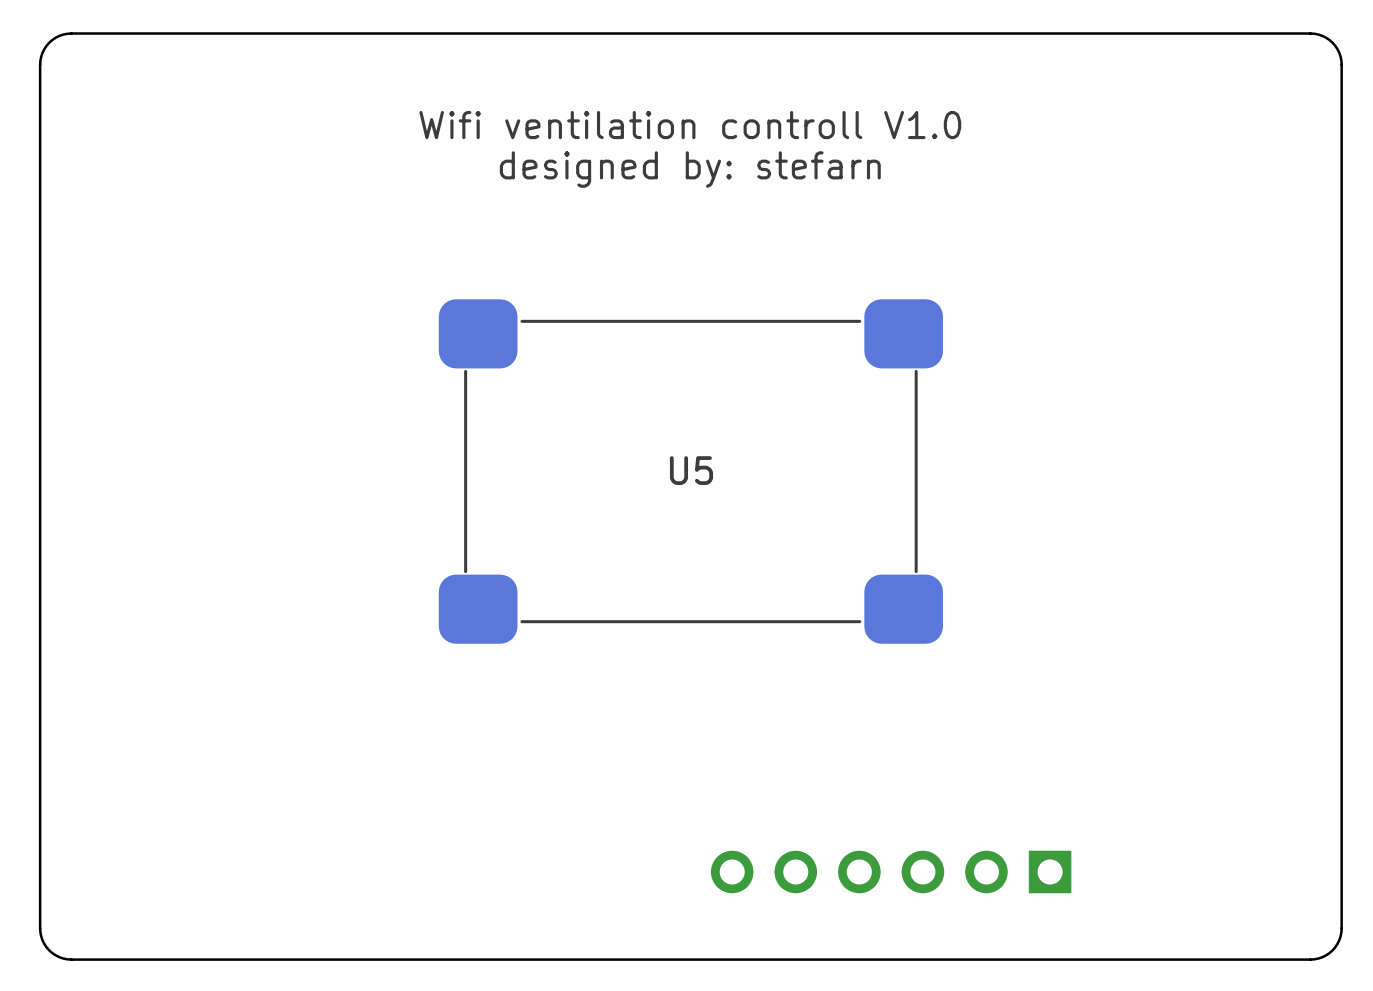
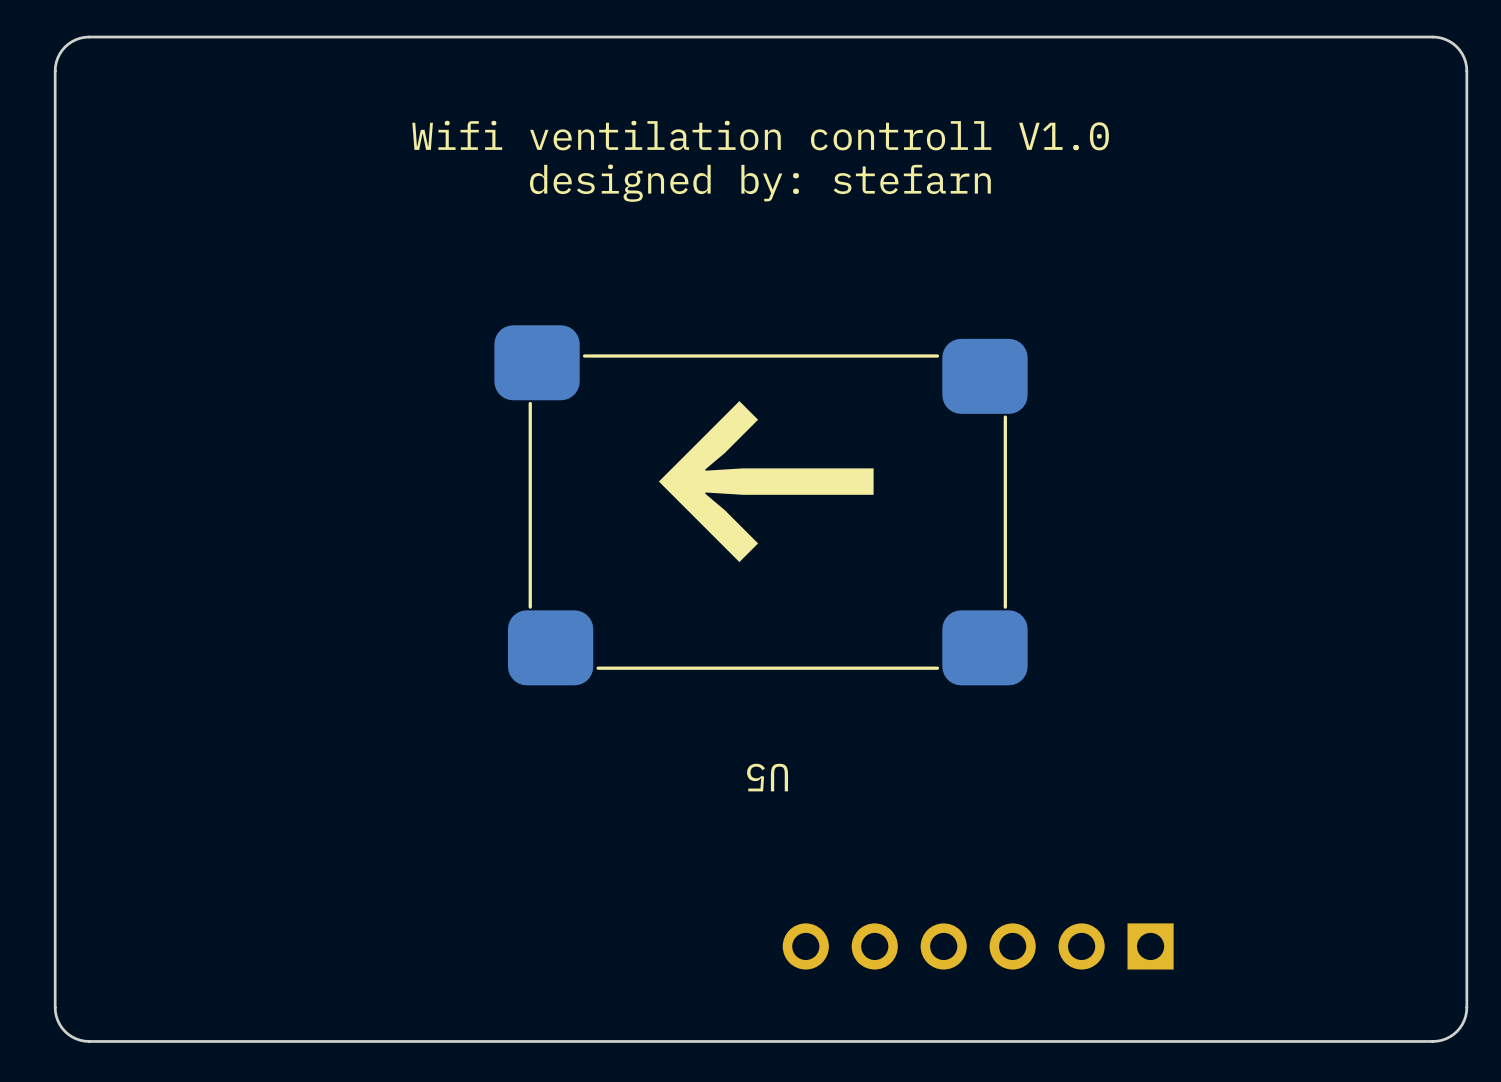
U5 footprint: [438, 299, 943, 644] -> [494, 325, 1028, 686]
U5 name position: U5 (691, 470) -> U5 (767, 777)

